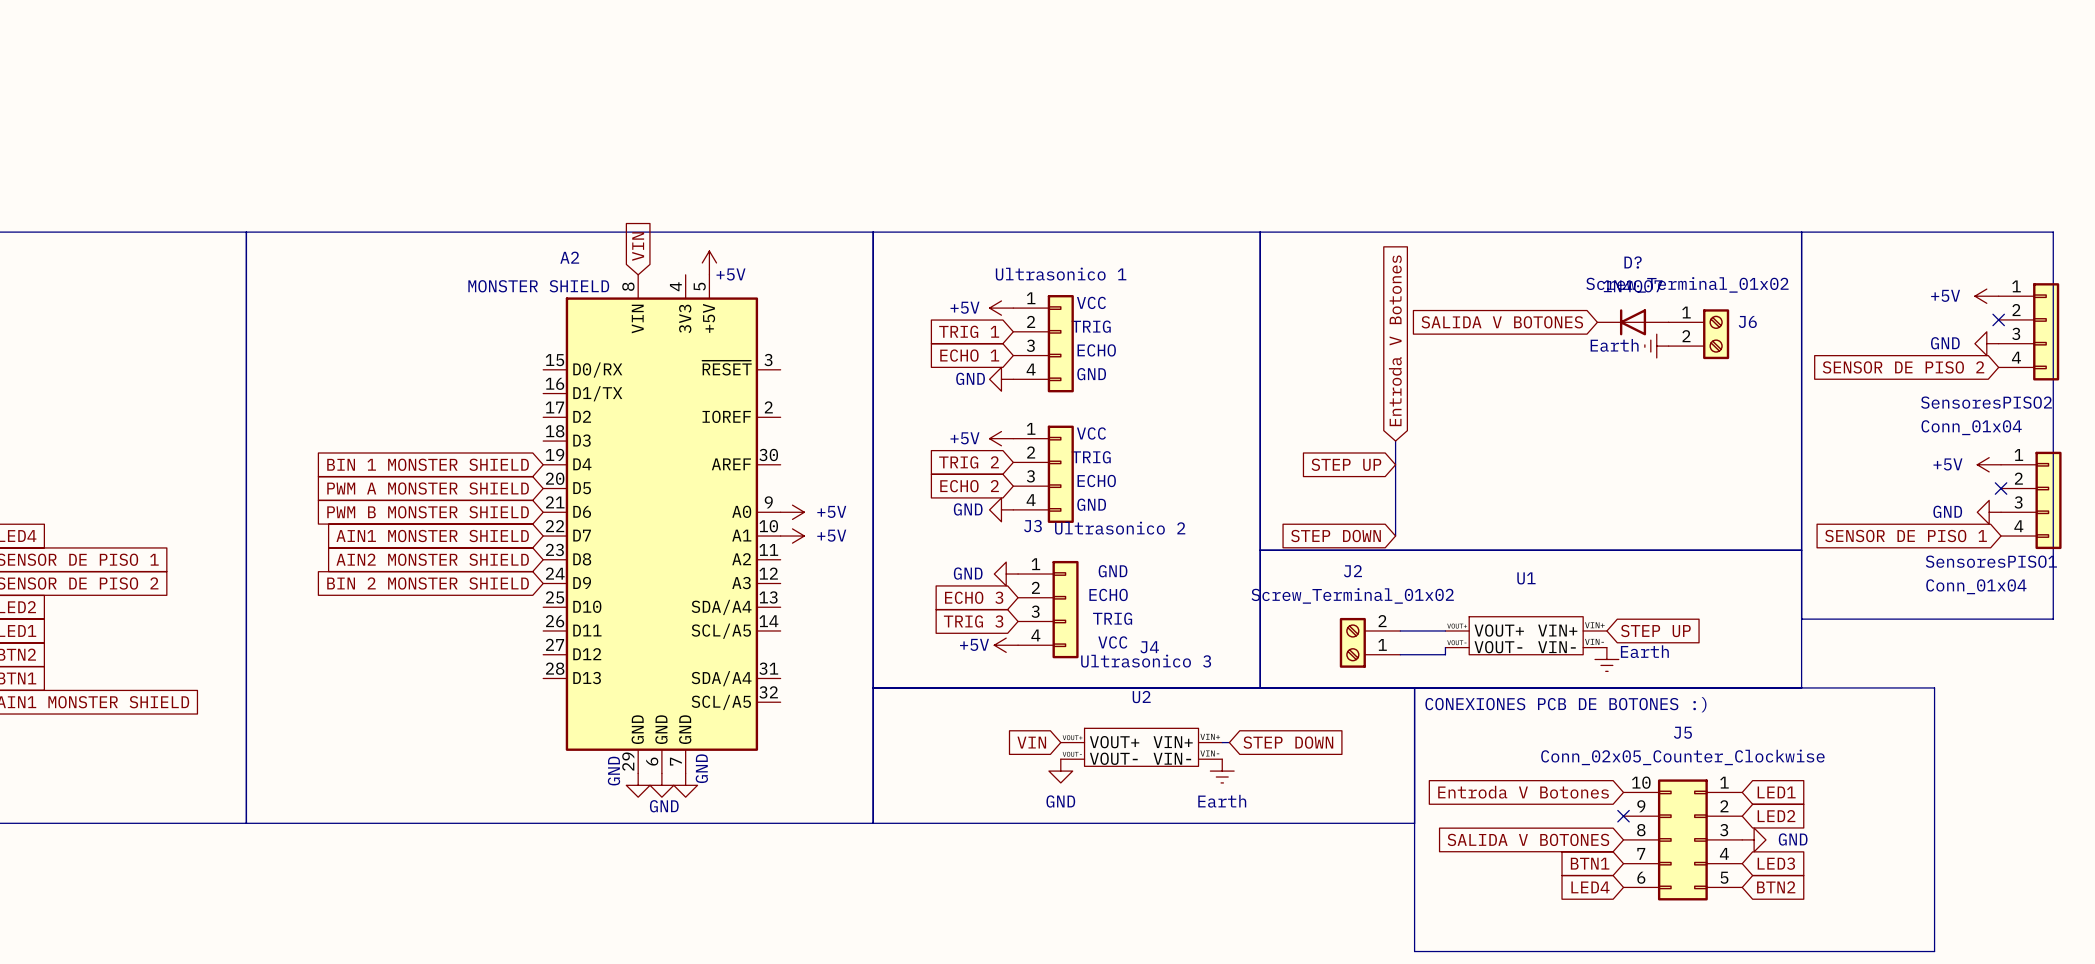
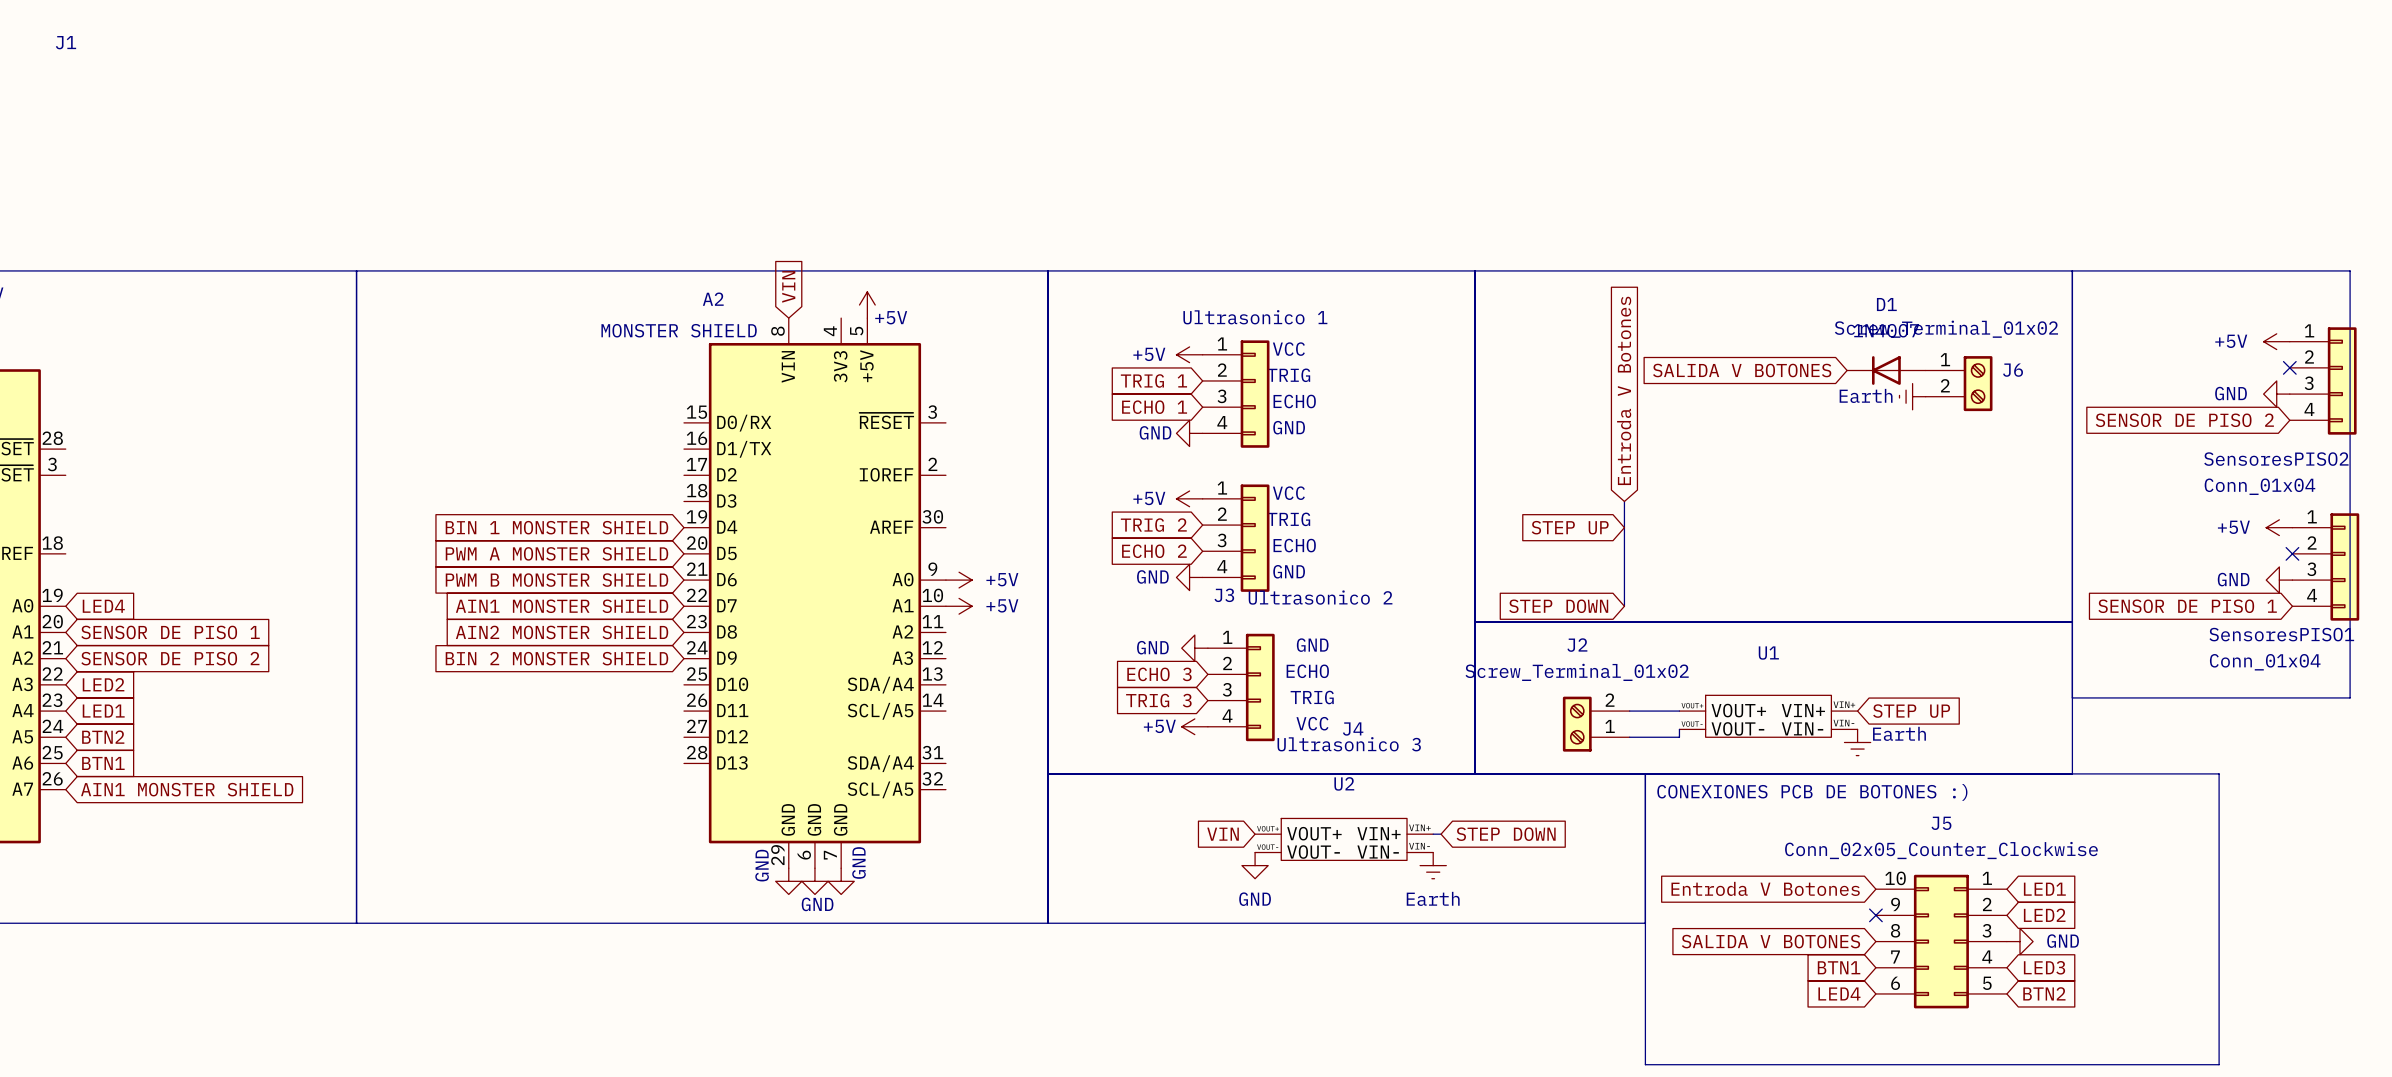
D? name: D? (1633, 262) -> D1 (1886, 304)

